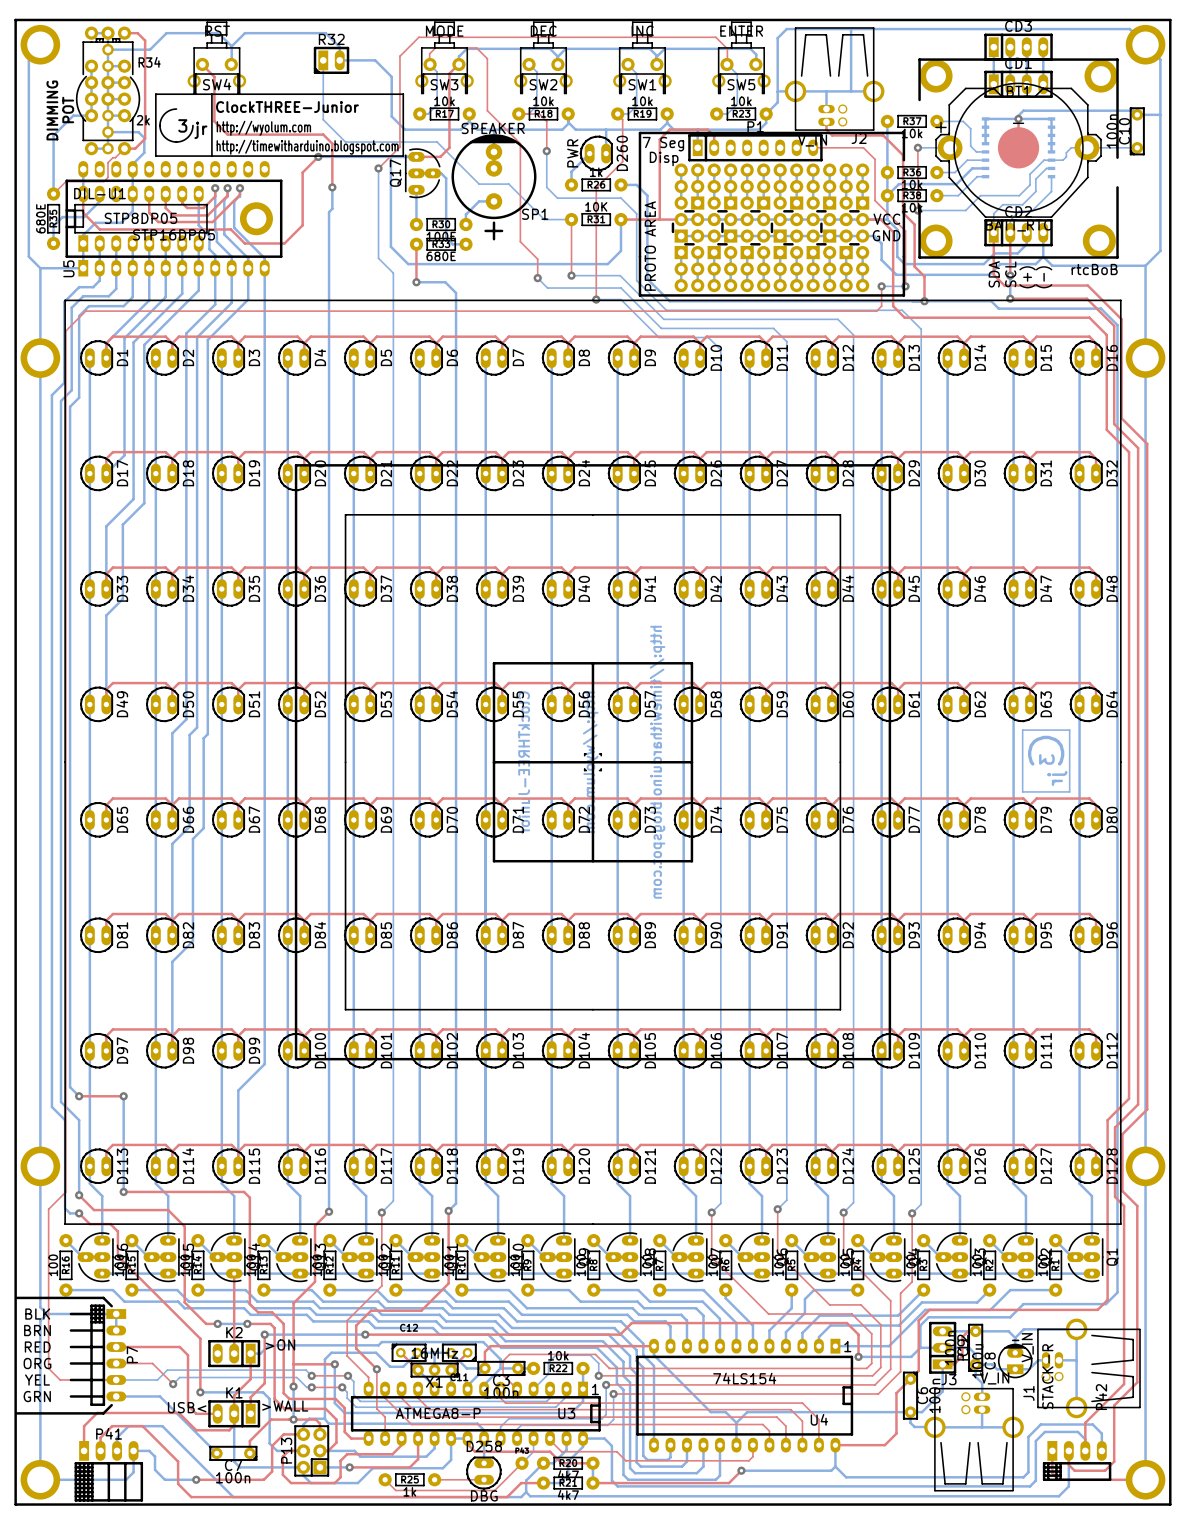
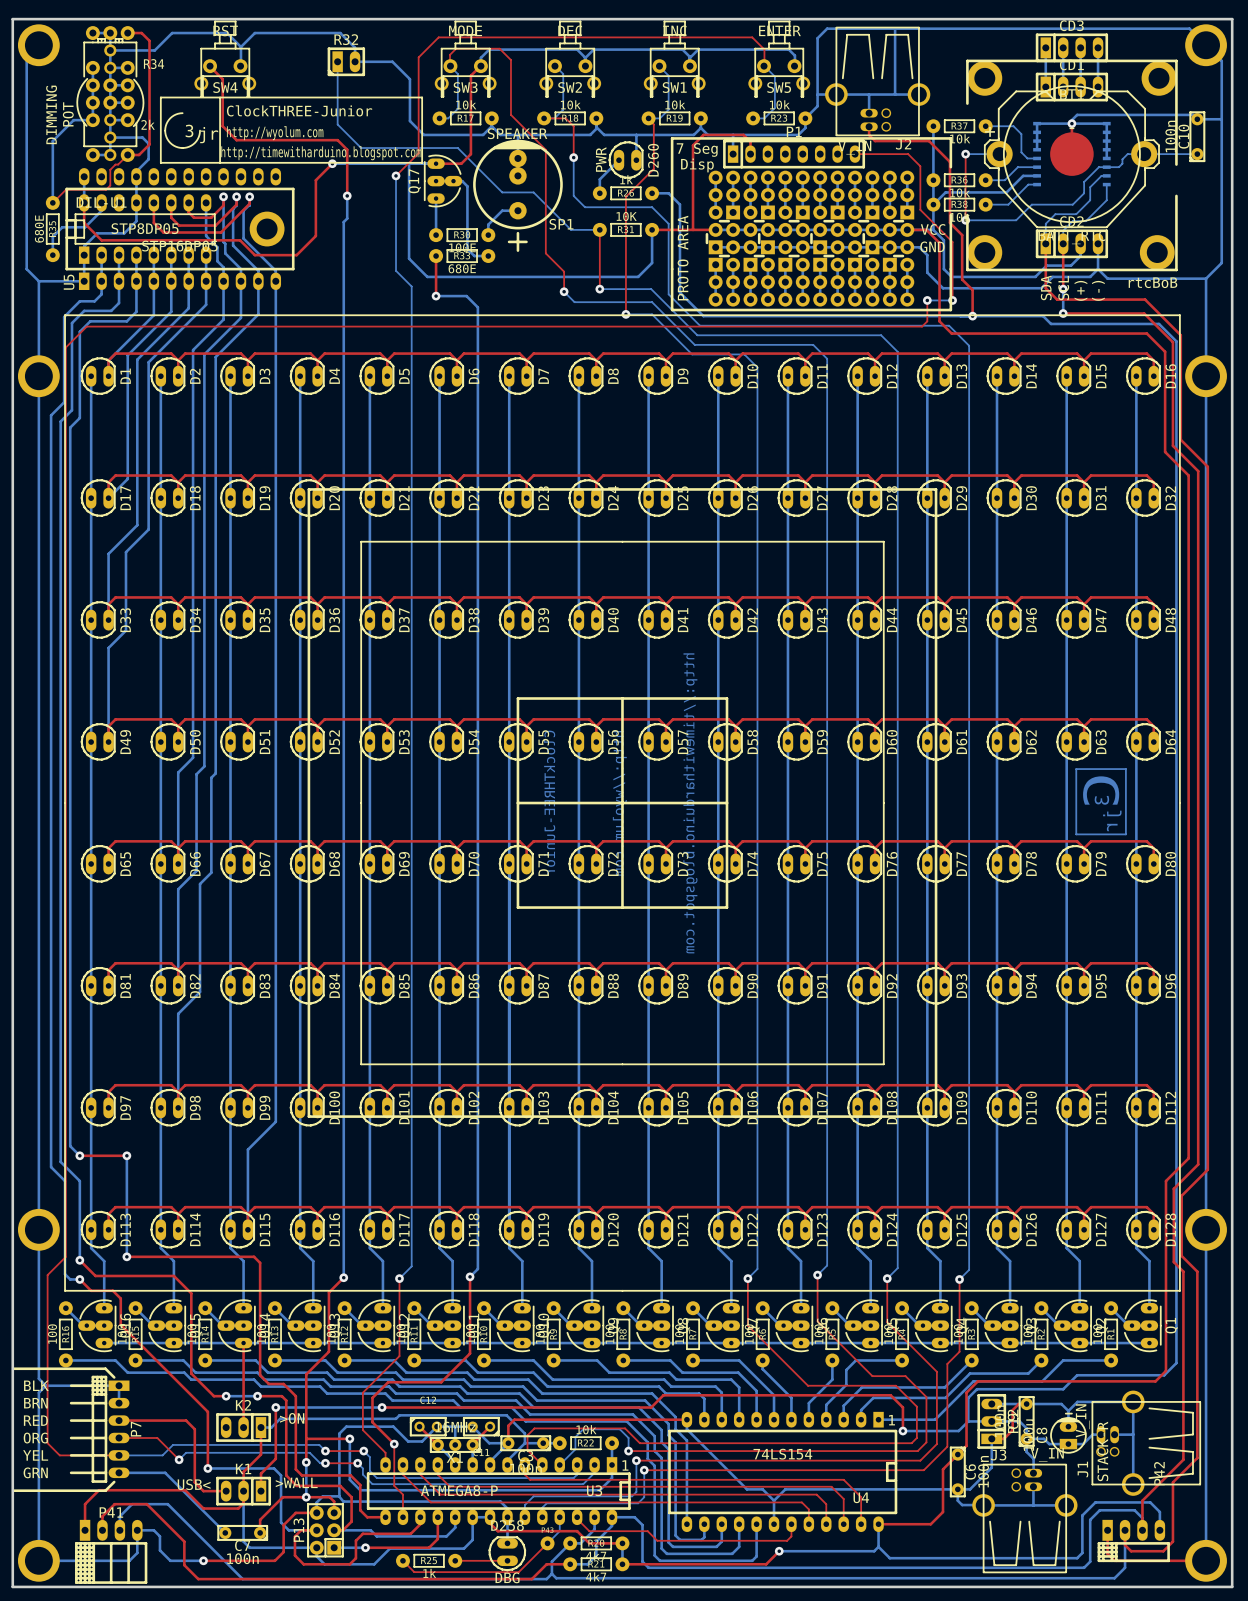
drawing: [583, 753, 603, 772] -> none

